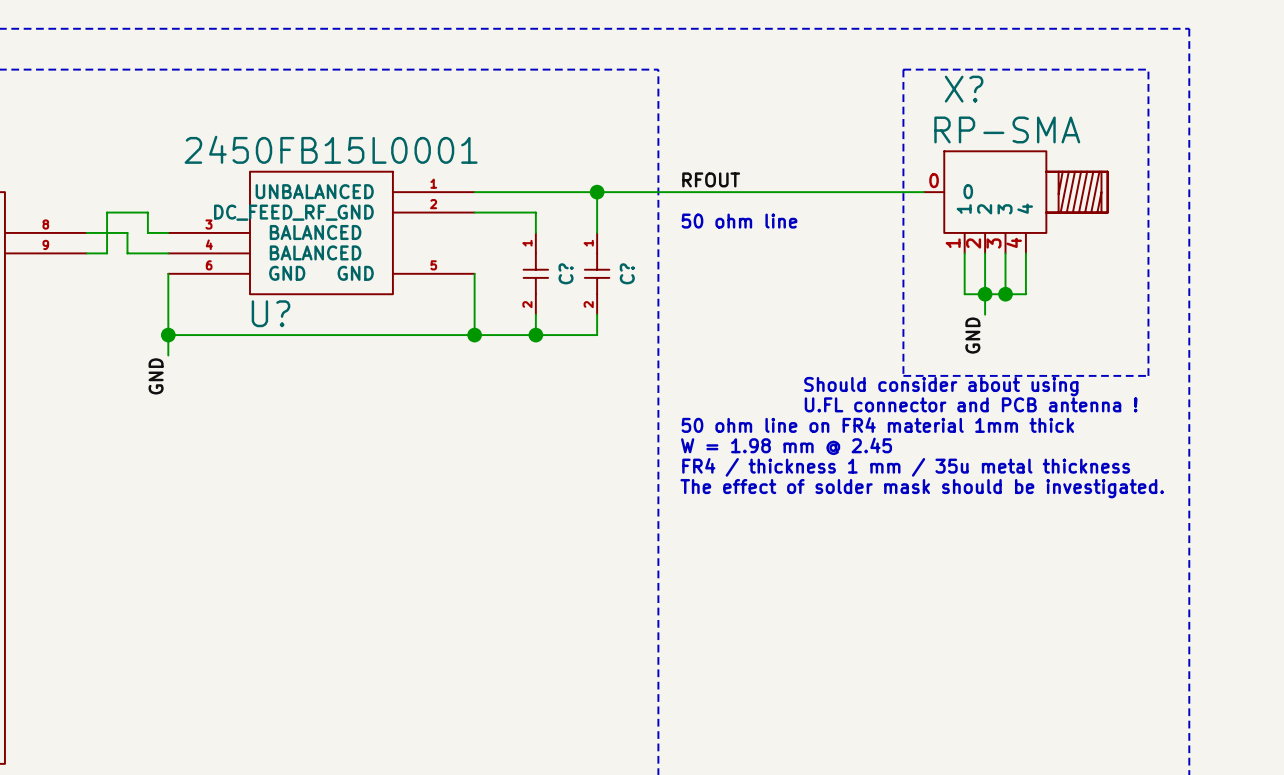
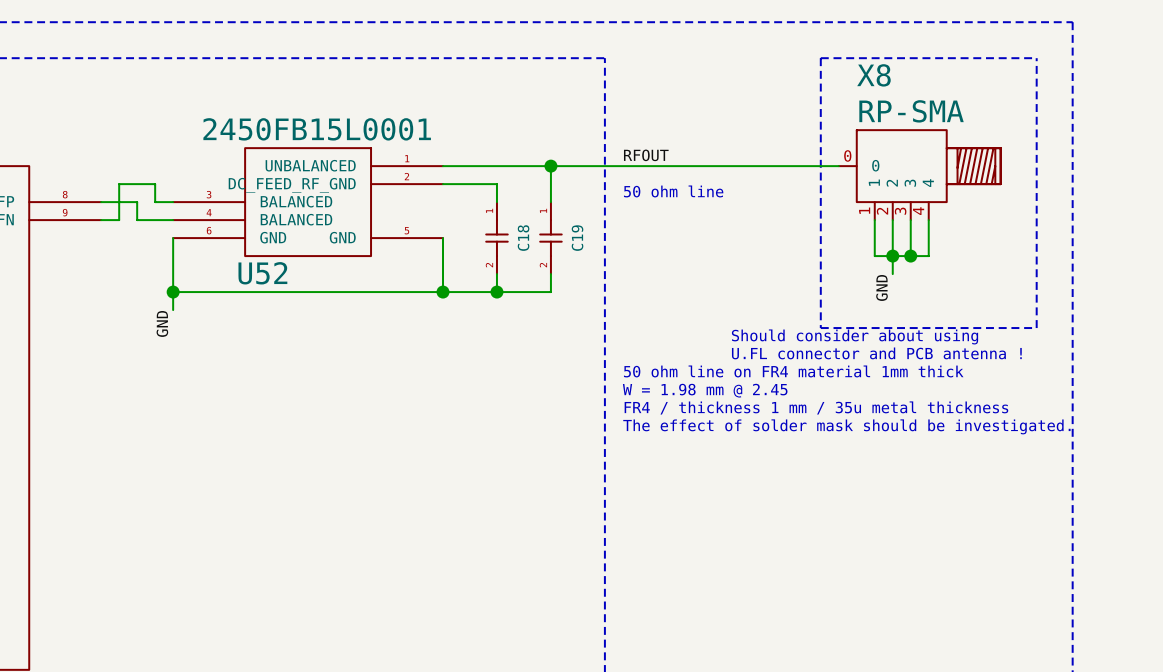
X? name: X? (964, 89) -> X8 (873, 75)
C? name: C? (566, 273) -> C18 (523, 238)
C? name: C? (627, 273) -> C19 (577, 238)
U? name: U? (270, 313) -> U52 (262, 273)

